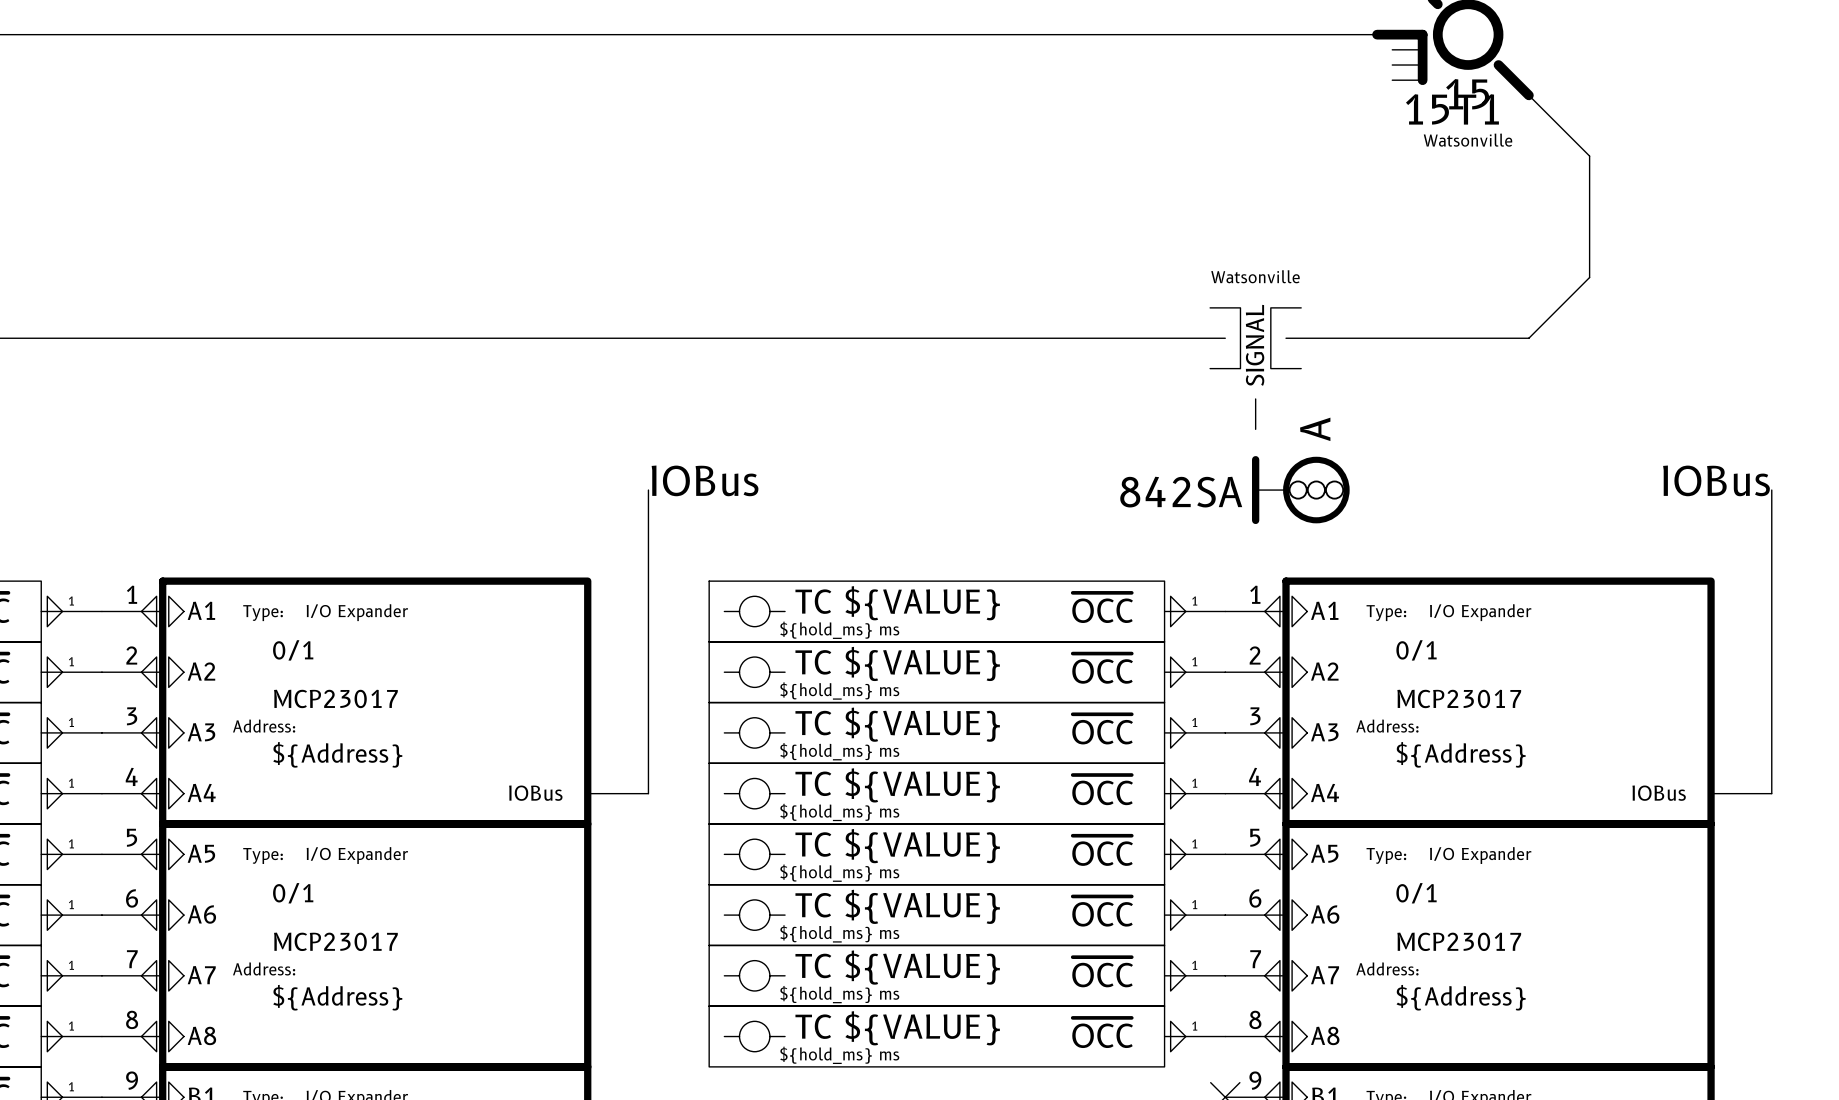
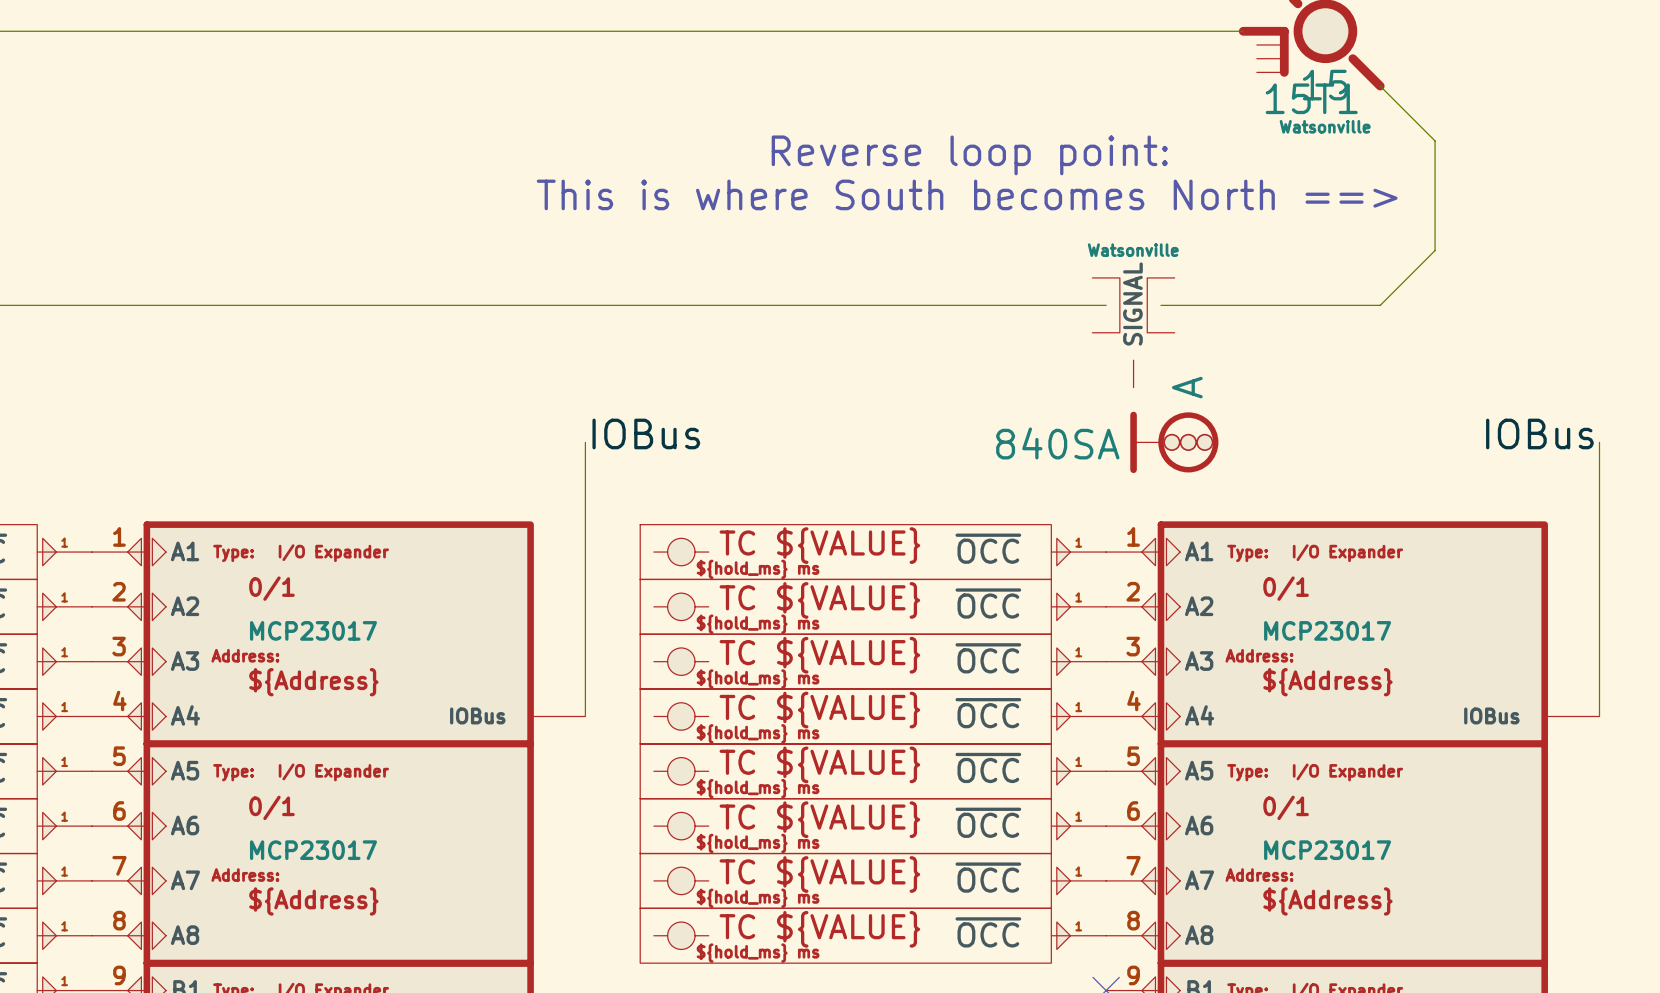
text: none -> Reverse loop point: (969, 155)
text: none -> This is where South becomes North ==> (967, 194)
part value: 842SA (1181, 492) -> 840SA (1057, 443)

